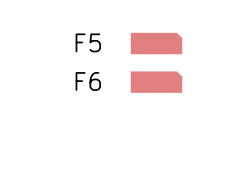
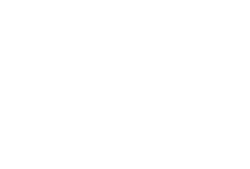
F5: (156, 43) -> none
F6: (156, 82) -> none

